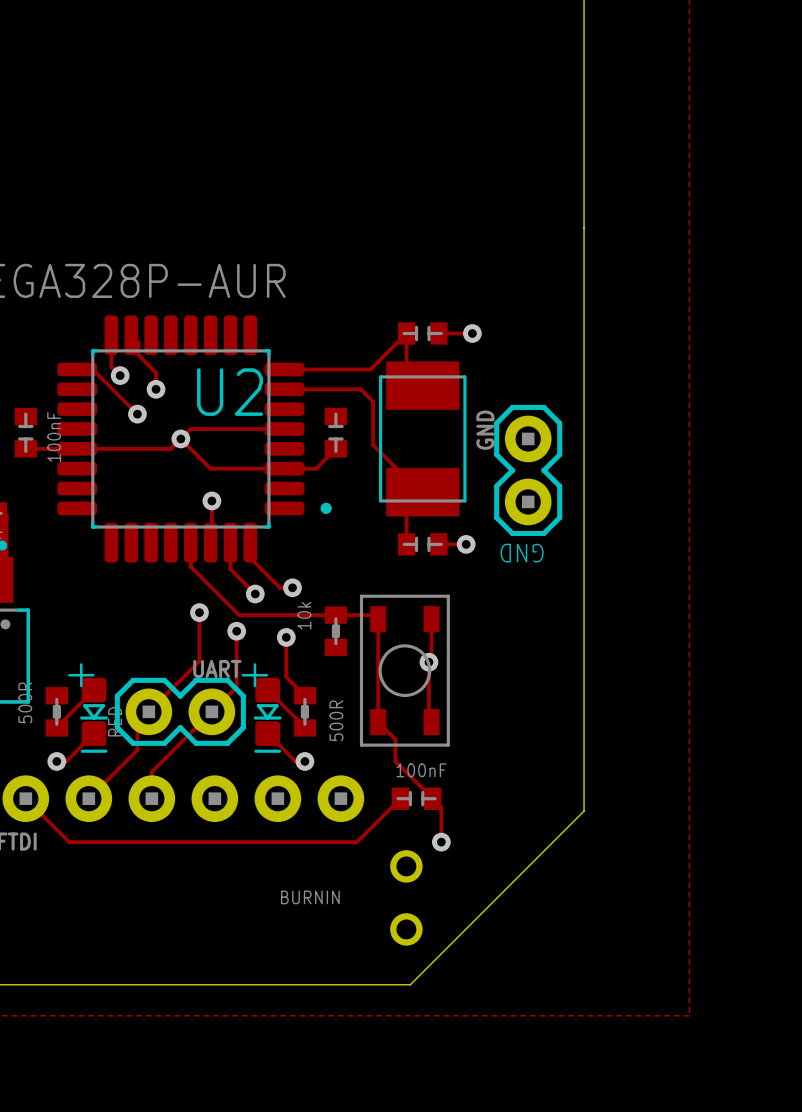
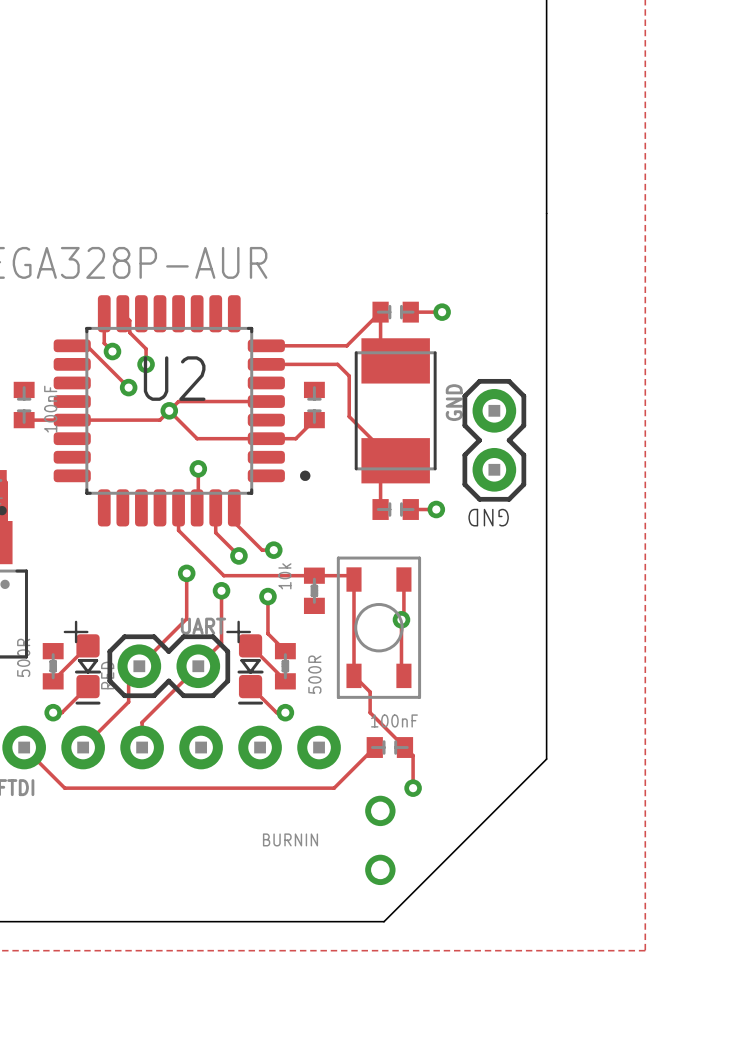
text position: U2 (230, 392) -> U2 (174, 378)

